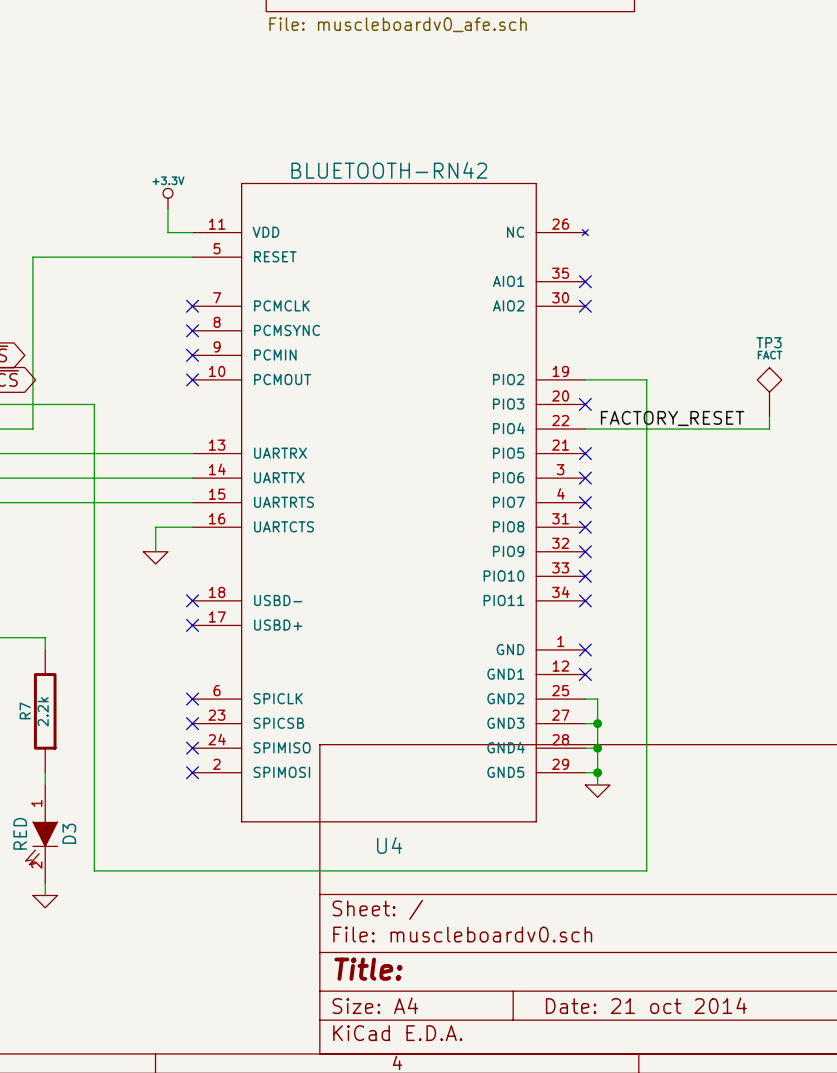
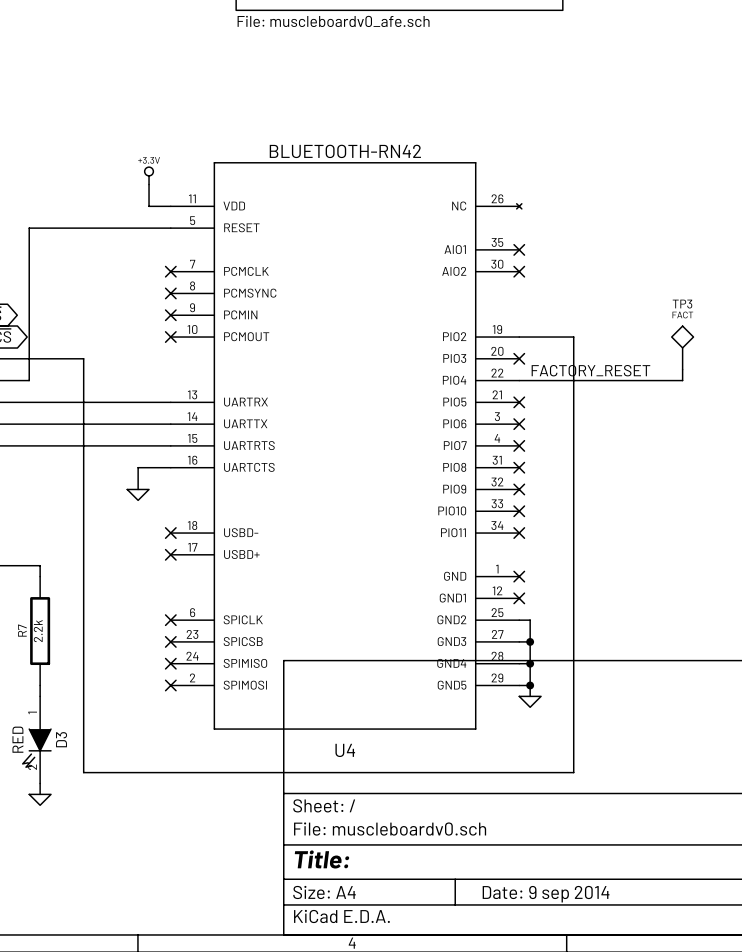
title block: Date: 21 oct 2014 (646, 1005) -> Date: 9 sep 2014 (546, 894)

